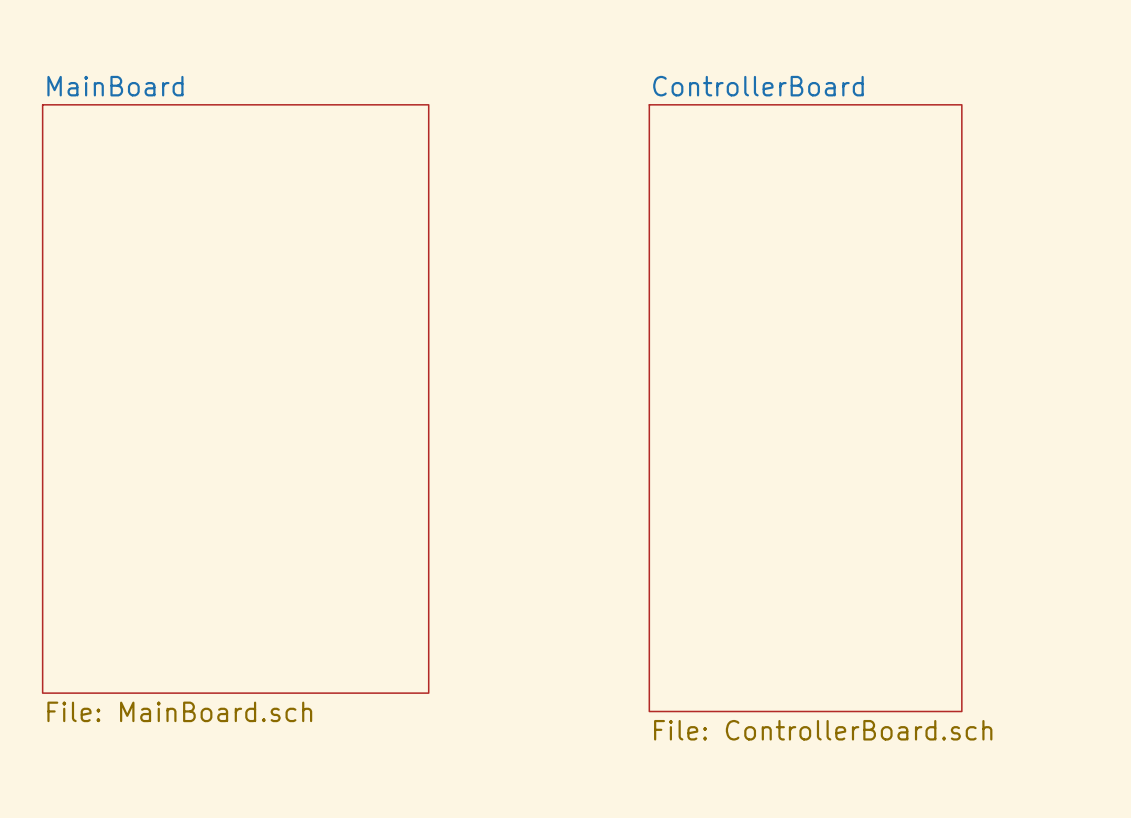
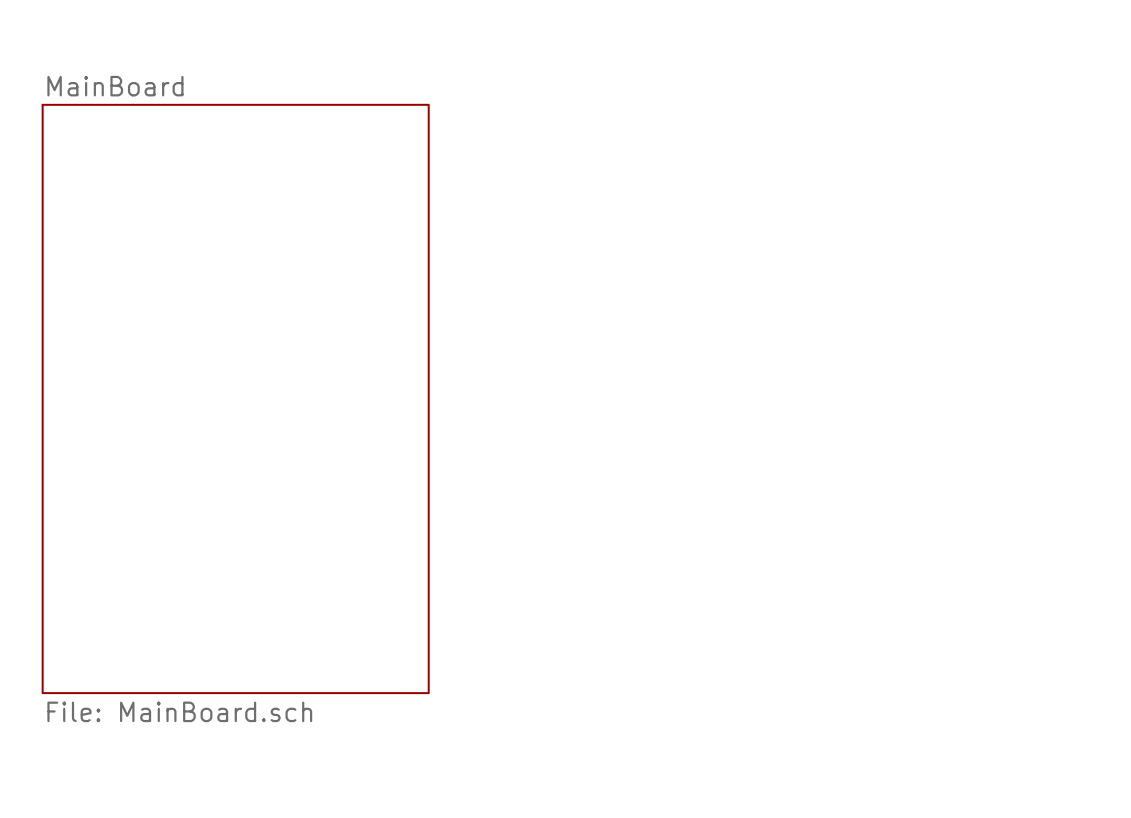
sheet ControllerBoard: File: ControllerBoard.sch (805, 408) -> none

